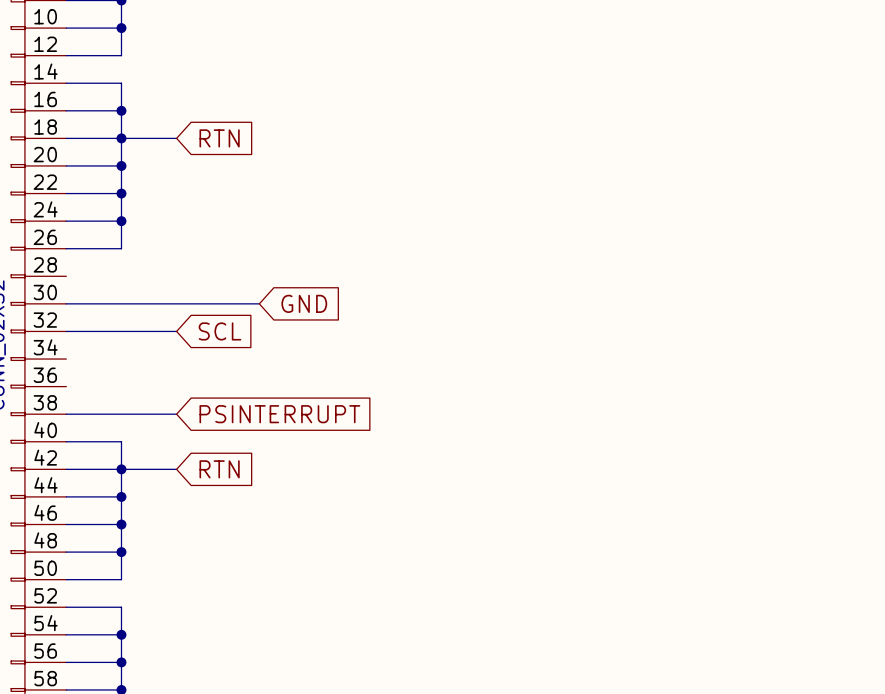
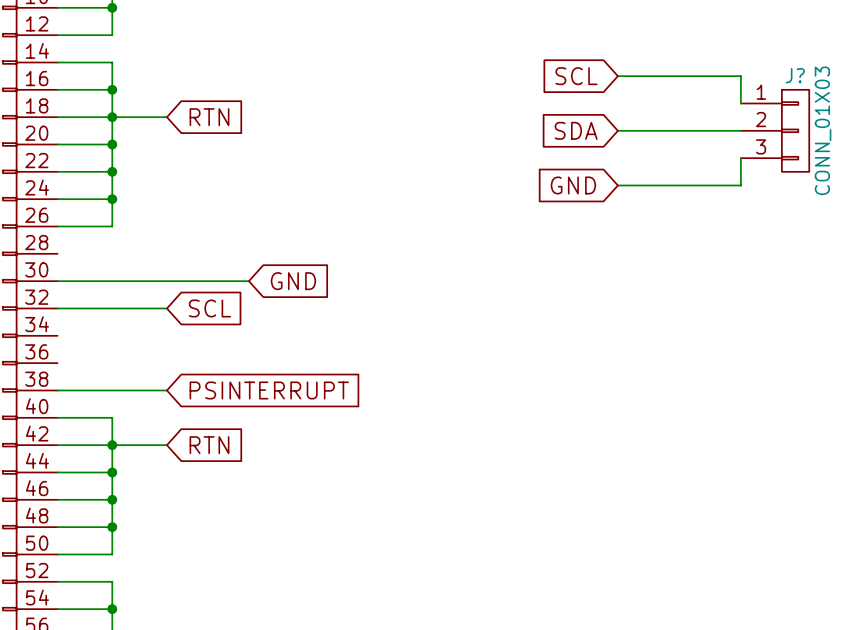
global label: none -> SCL (576, 76)
wire: none -> (617, 76) (740, 76) (740, 103)
global label: none -> SDA (576, 130)
wire: none -> (617, 130) (740, 130)
J?: none -> CONN_01X03 (775, 130)
wire: none -> (740, 158) (740, 185) (617, 185)
global label: none -> GND (573, 185)

